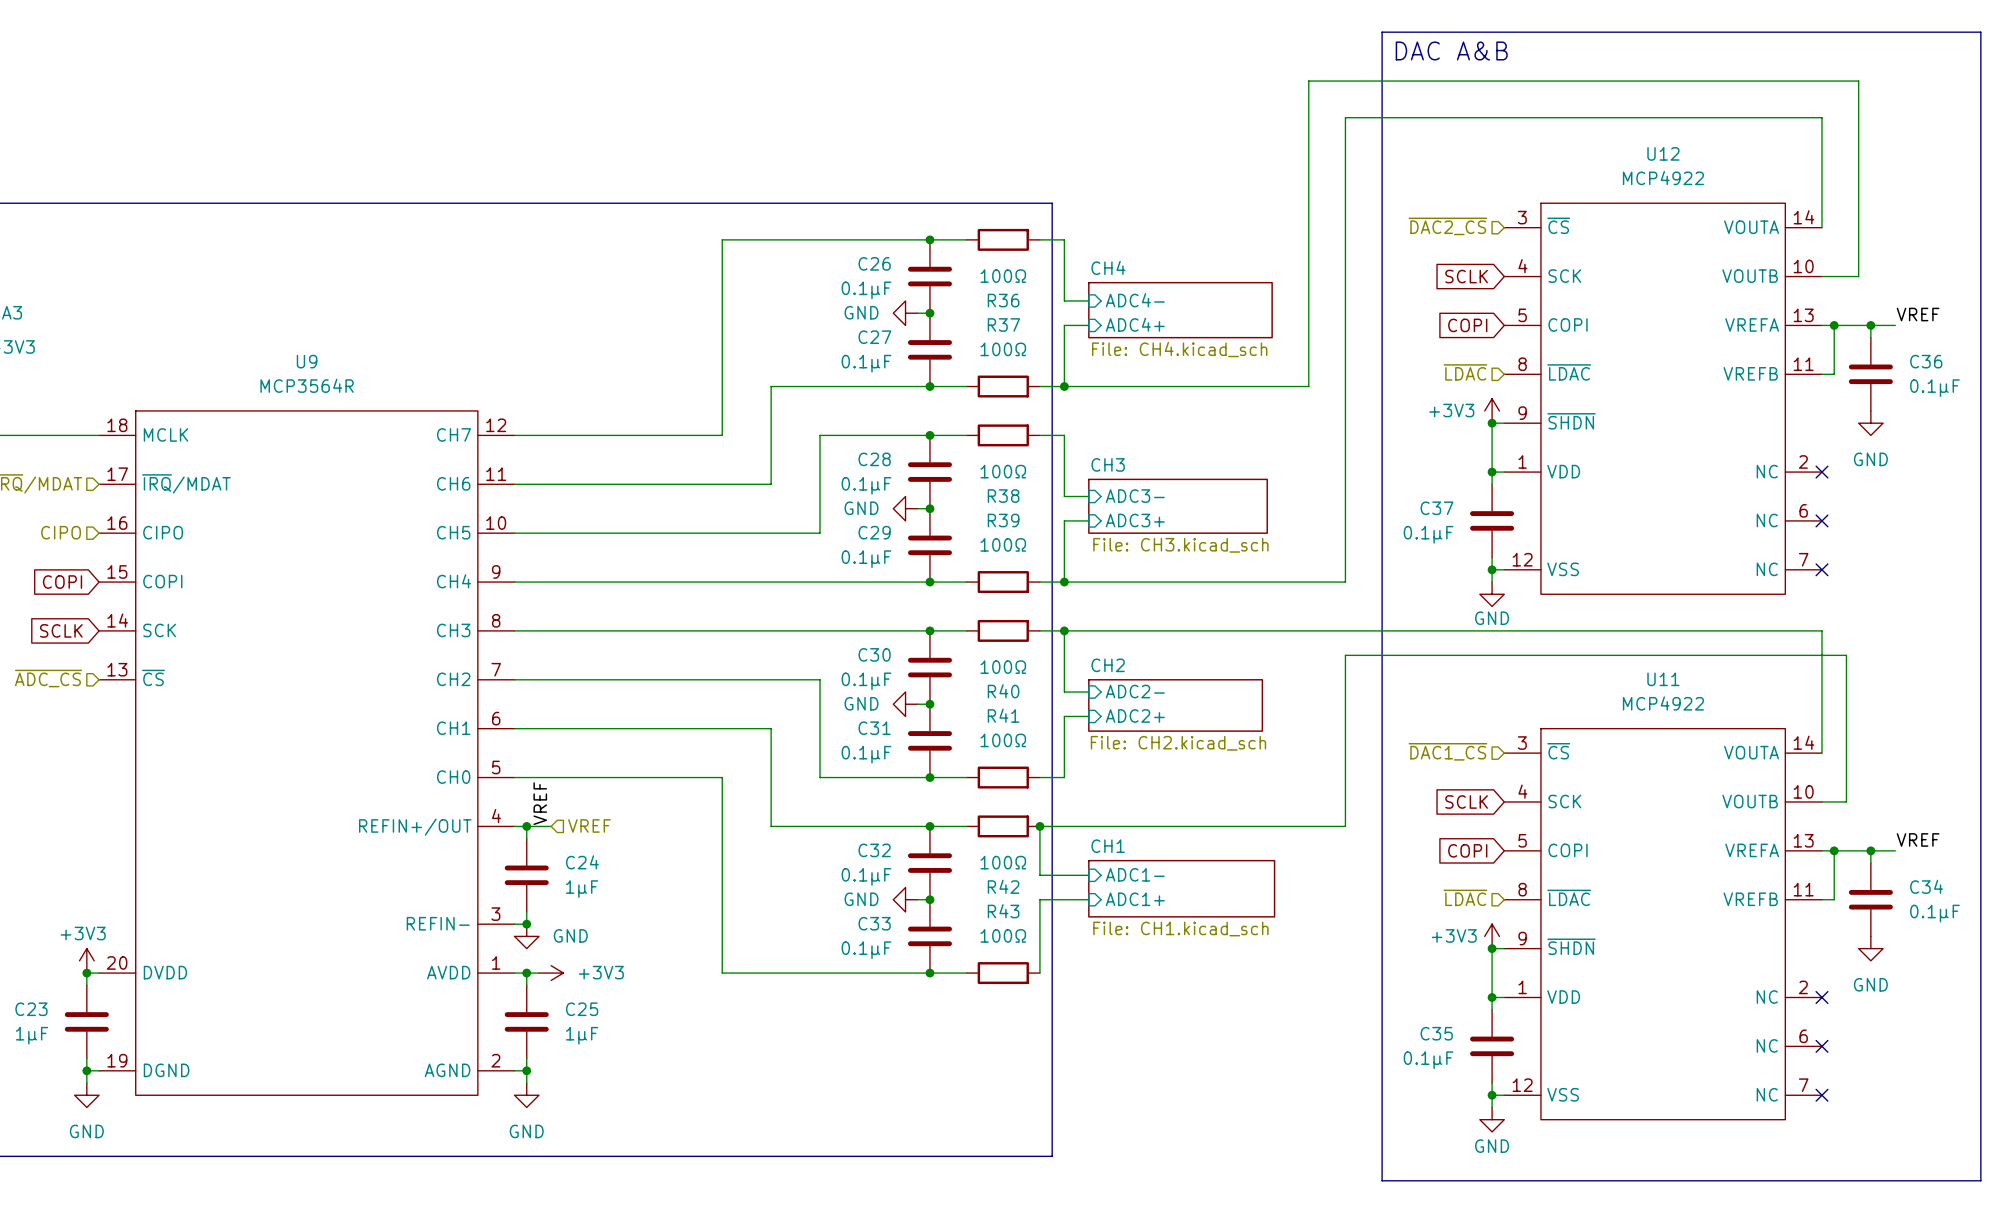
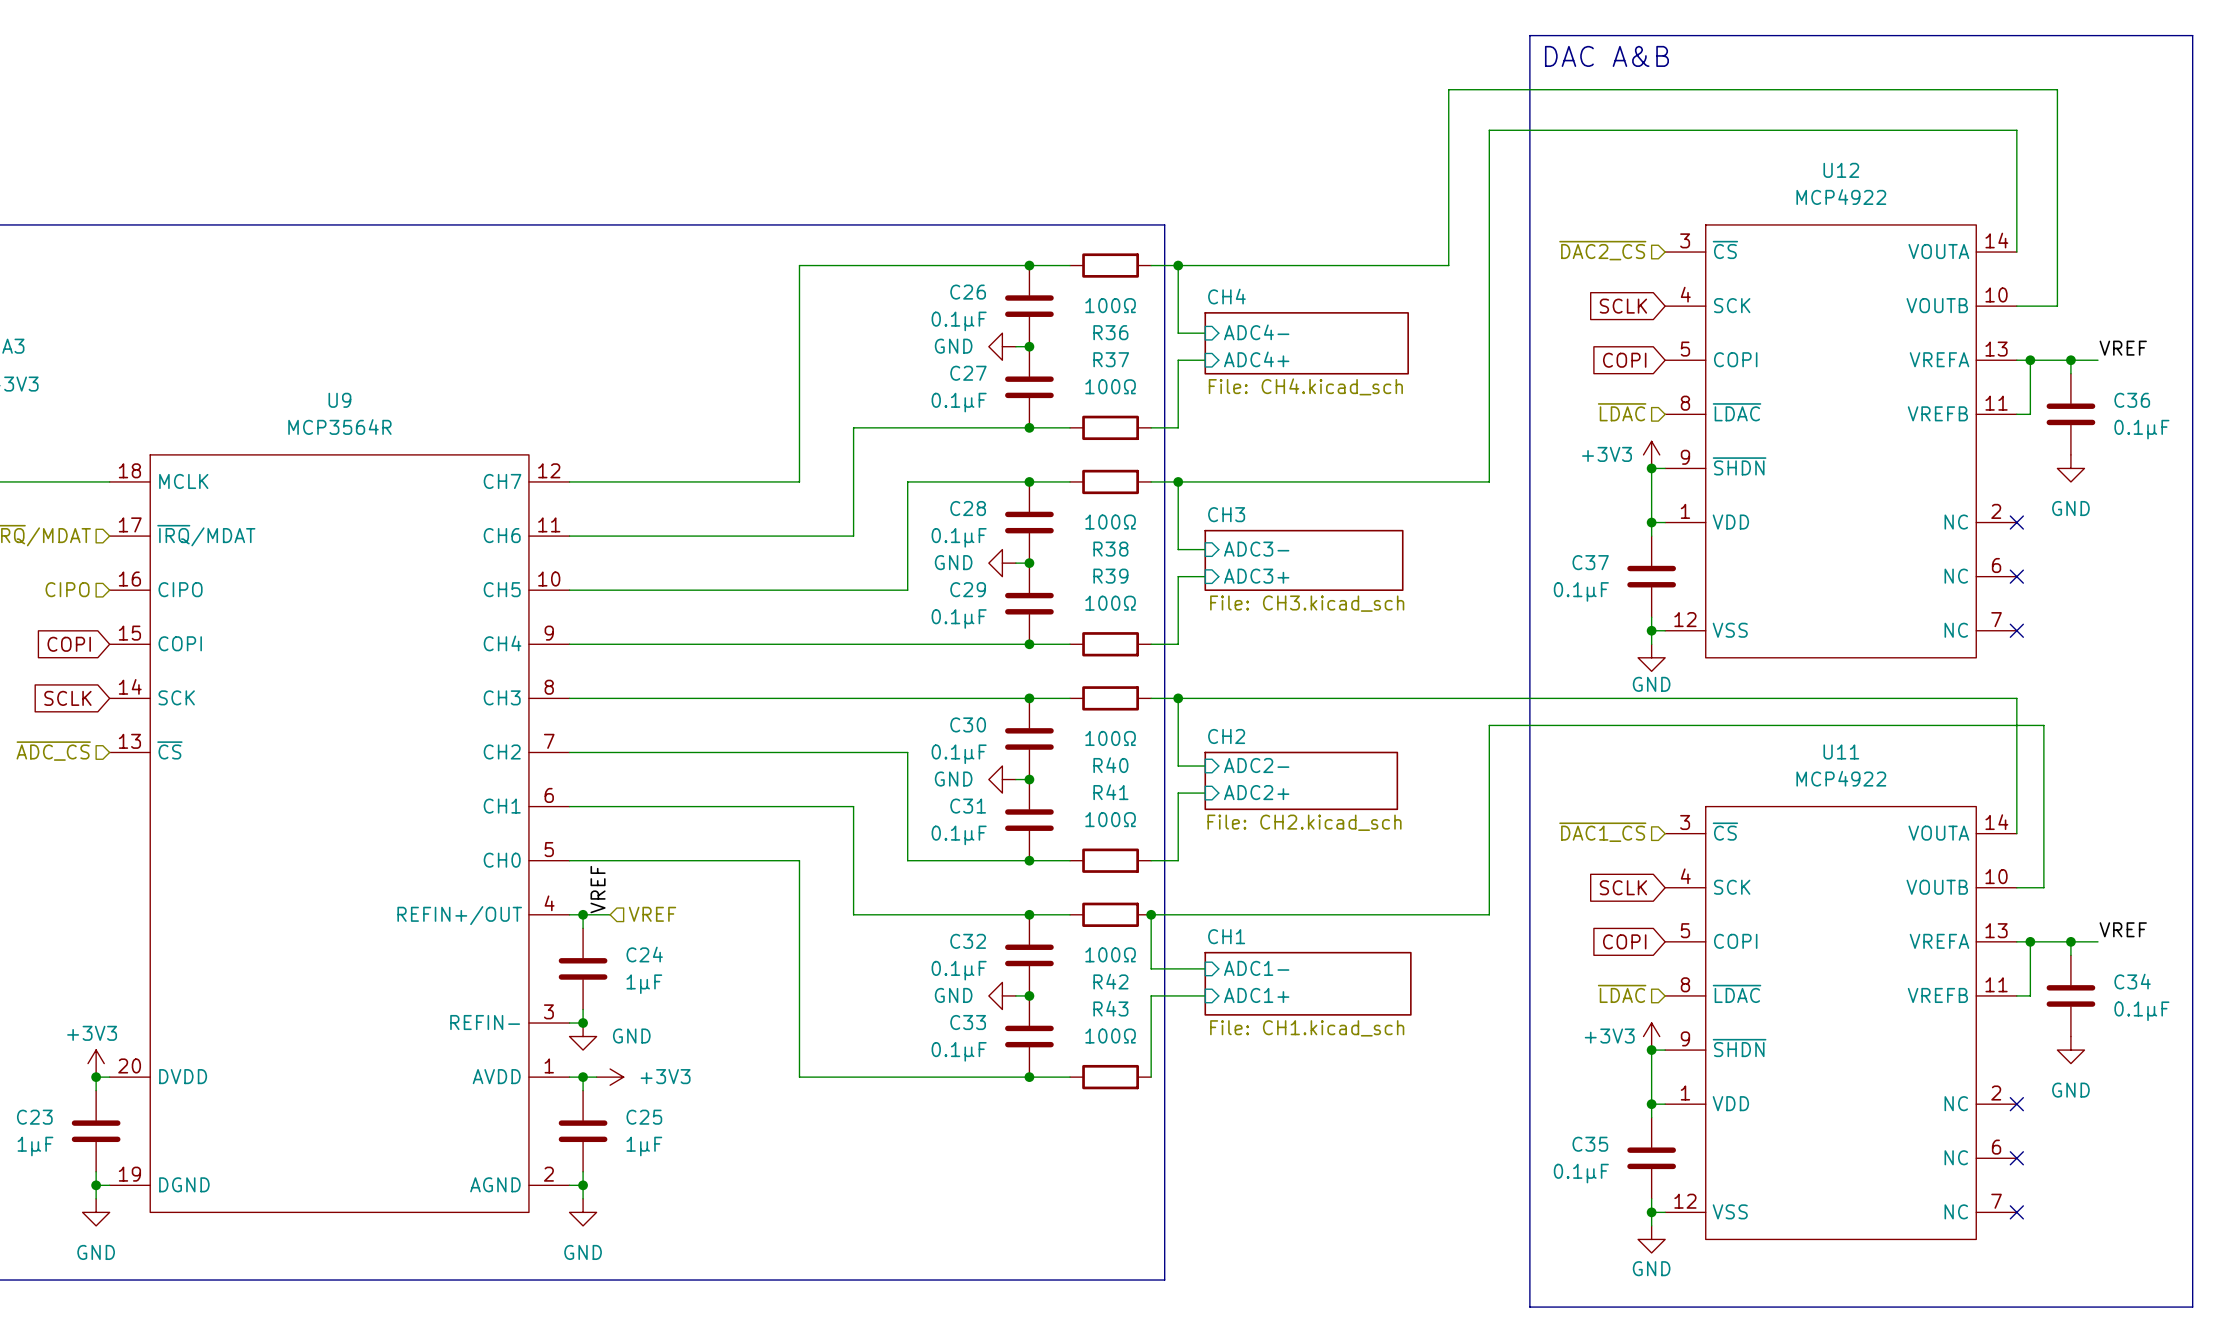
junction: none -> (1178, 265)
wire: (1308, 239) (1308, 386) (1064, 386) -> (1448, 265) (1178, 265)
junction position: (1064, 386) -> (1178, 481)
wire: (1345, 435) (1345, 582) (1064, 582) -> (1489, 481) (1178, 481)
junction: (1064, 582) -> none

